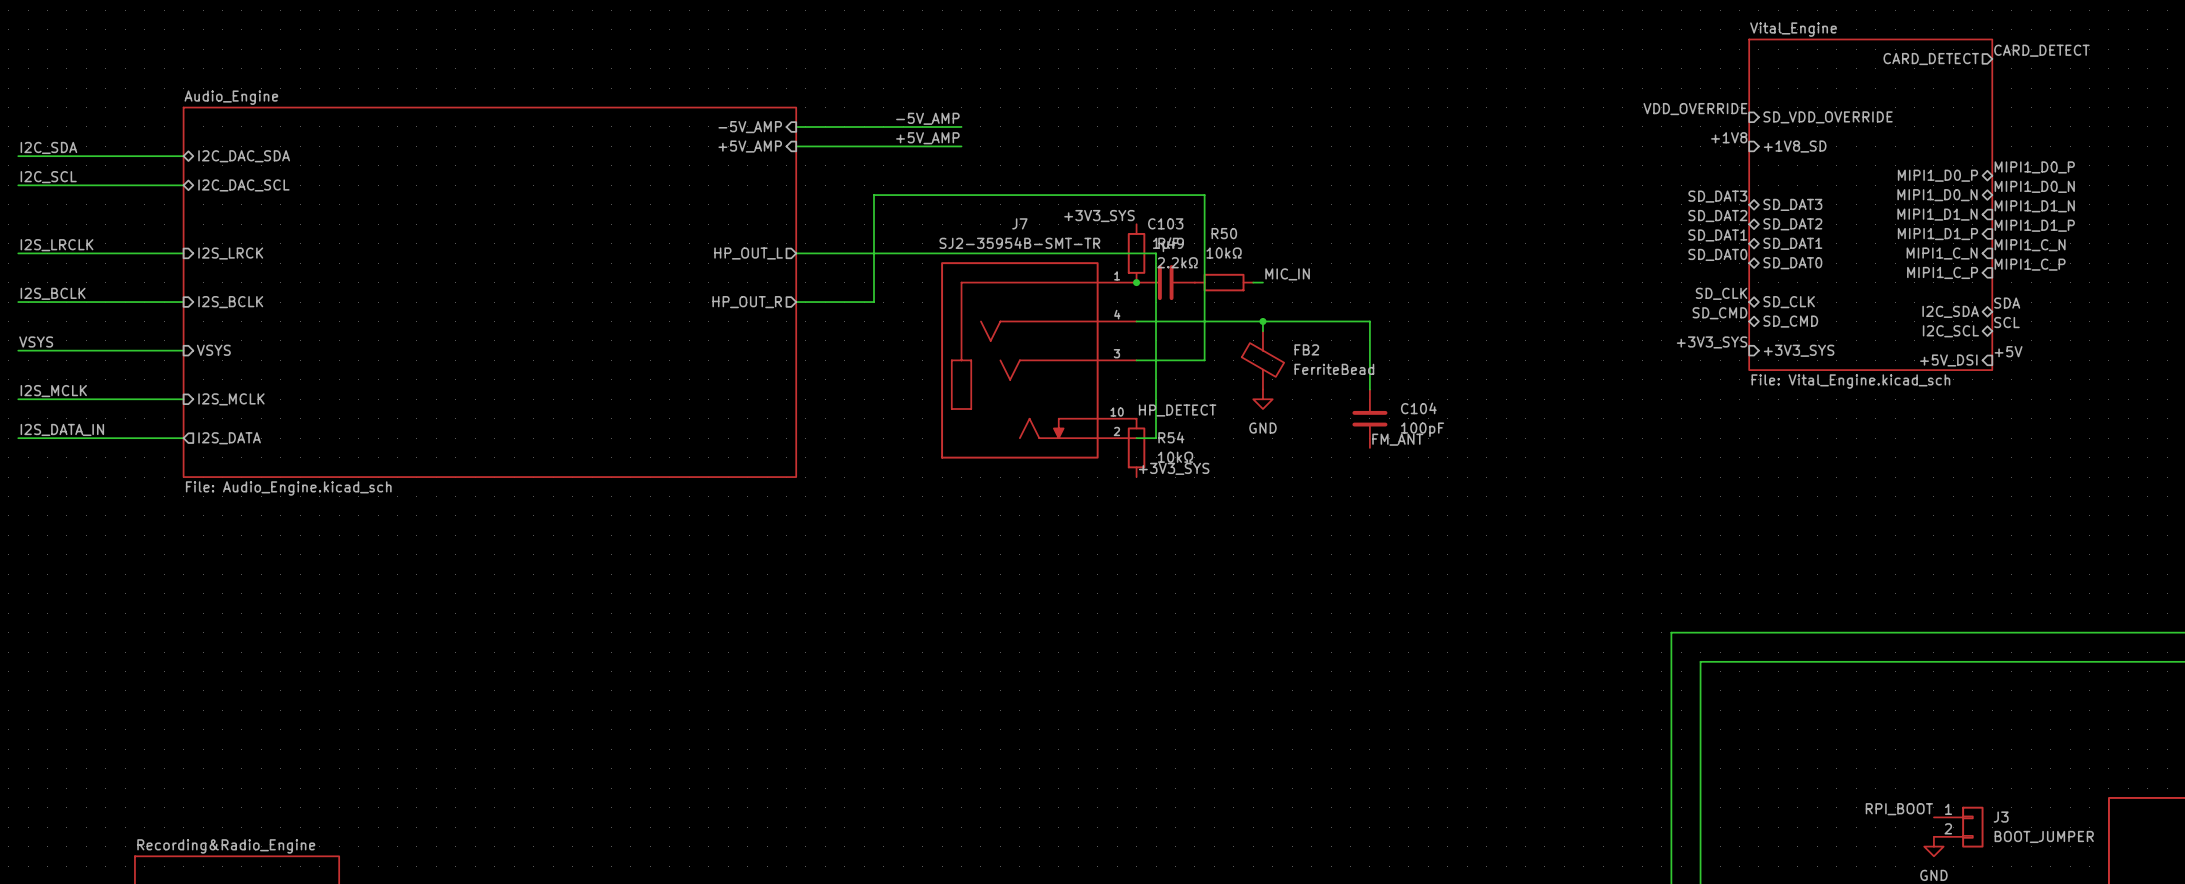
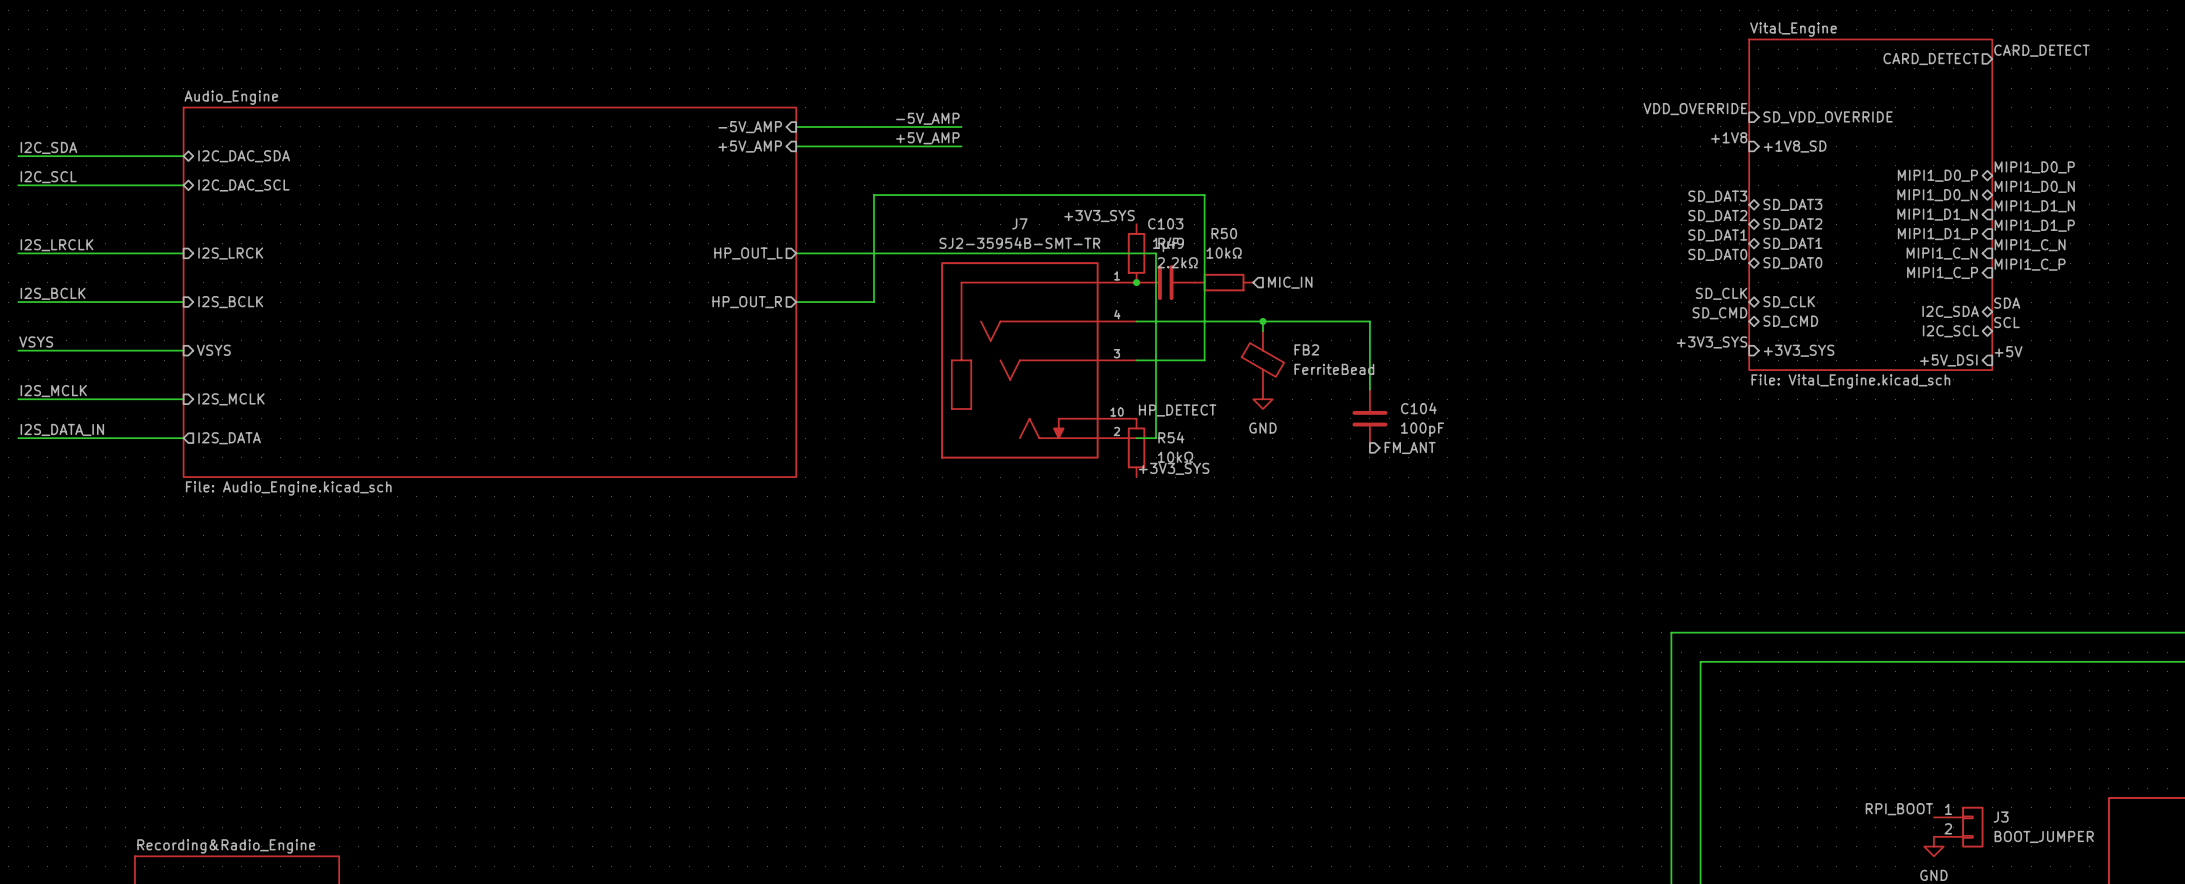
label: MIC_IN (1287, 274) -> none
wire: (1253, 282) (1262, 282) -> none
hierarchical label: none -> MIC_IN (1290, 282)
label: FM_ANT (1397, 439) -> none
hierarchical label: none -> FM_ANT (1410, 447)

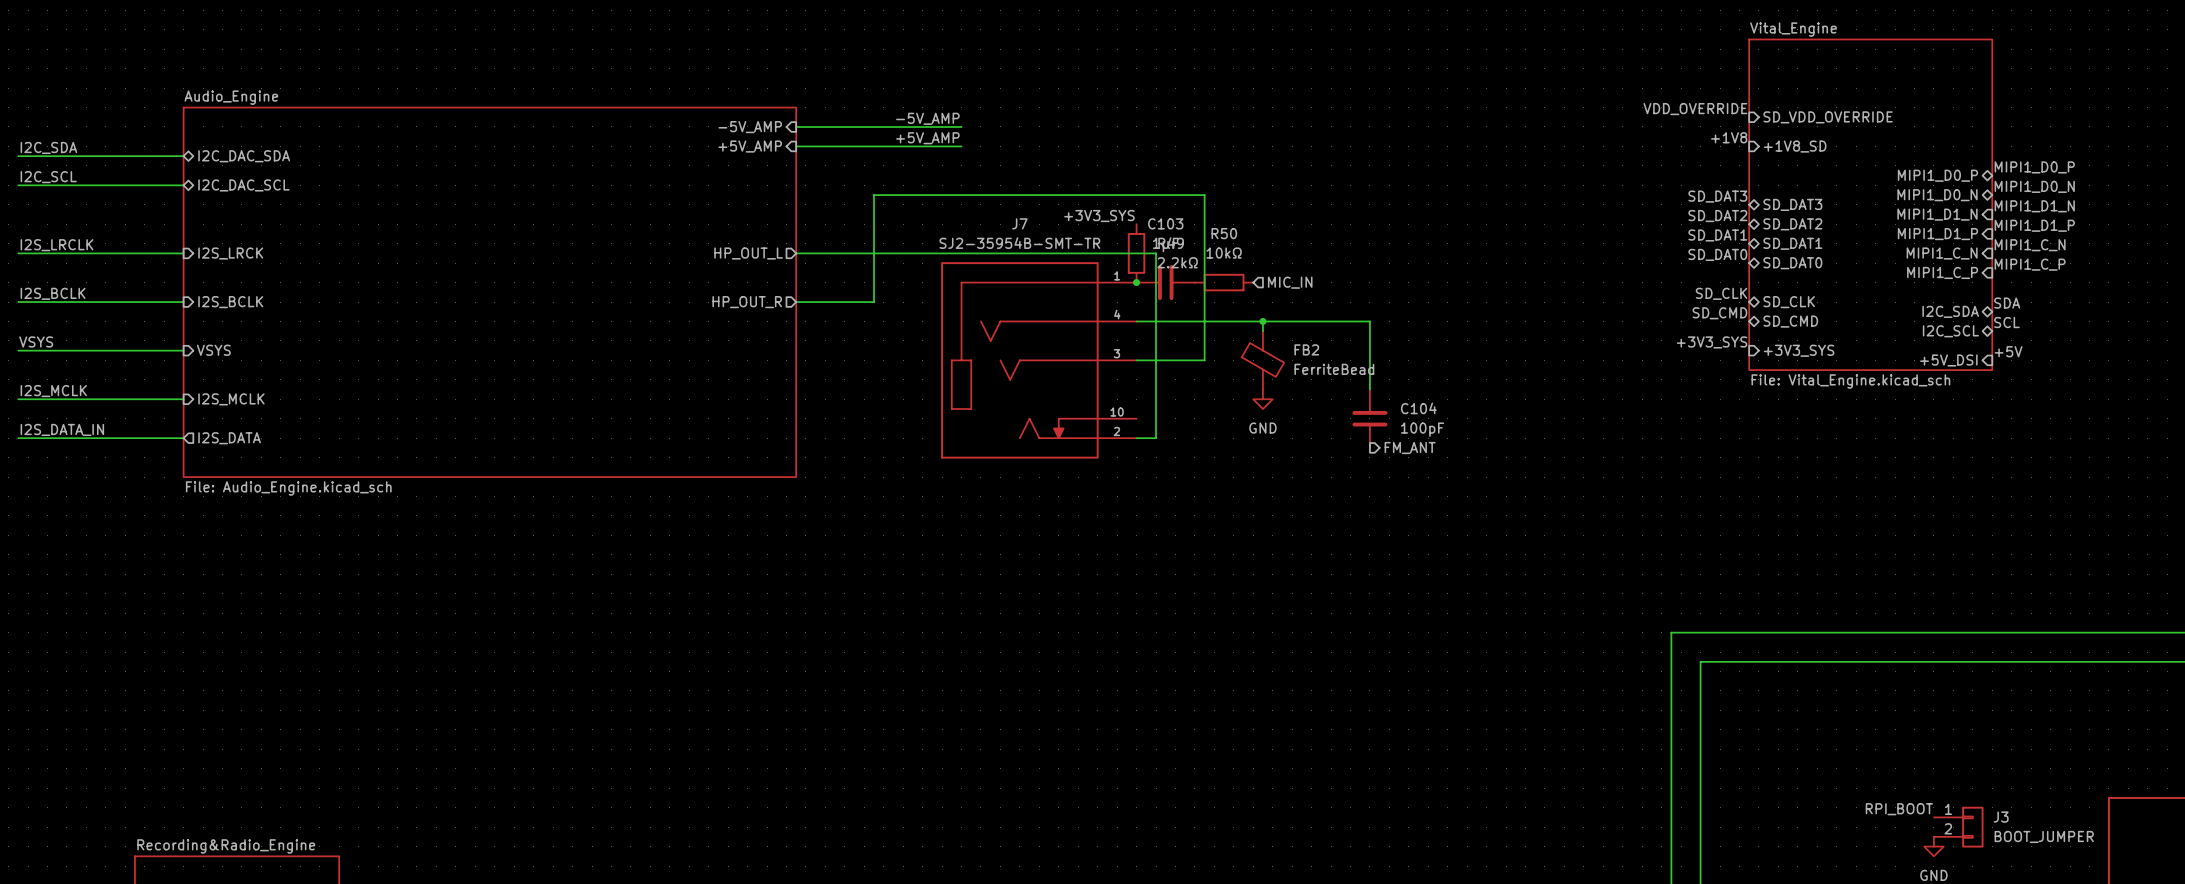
label: CARD_DETECT (2041, 50) -> none
sheet pin: CARD_DETECT (1931, 59) -> none
label: HP_DETECT (1177, 410) -> none
R54: 10kΩ (1136, 447) -> none
label: +3V3_SYS (1174, 468) -> none

